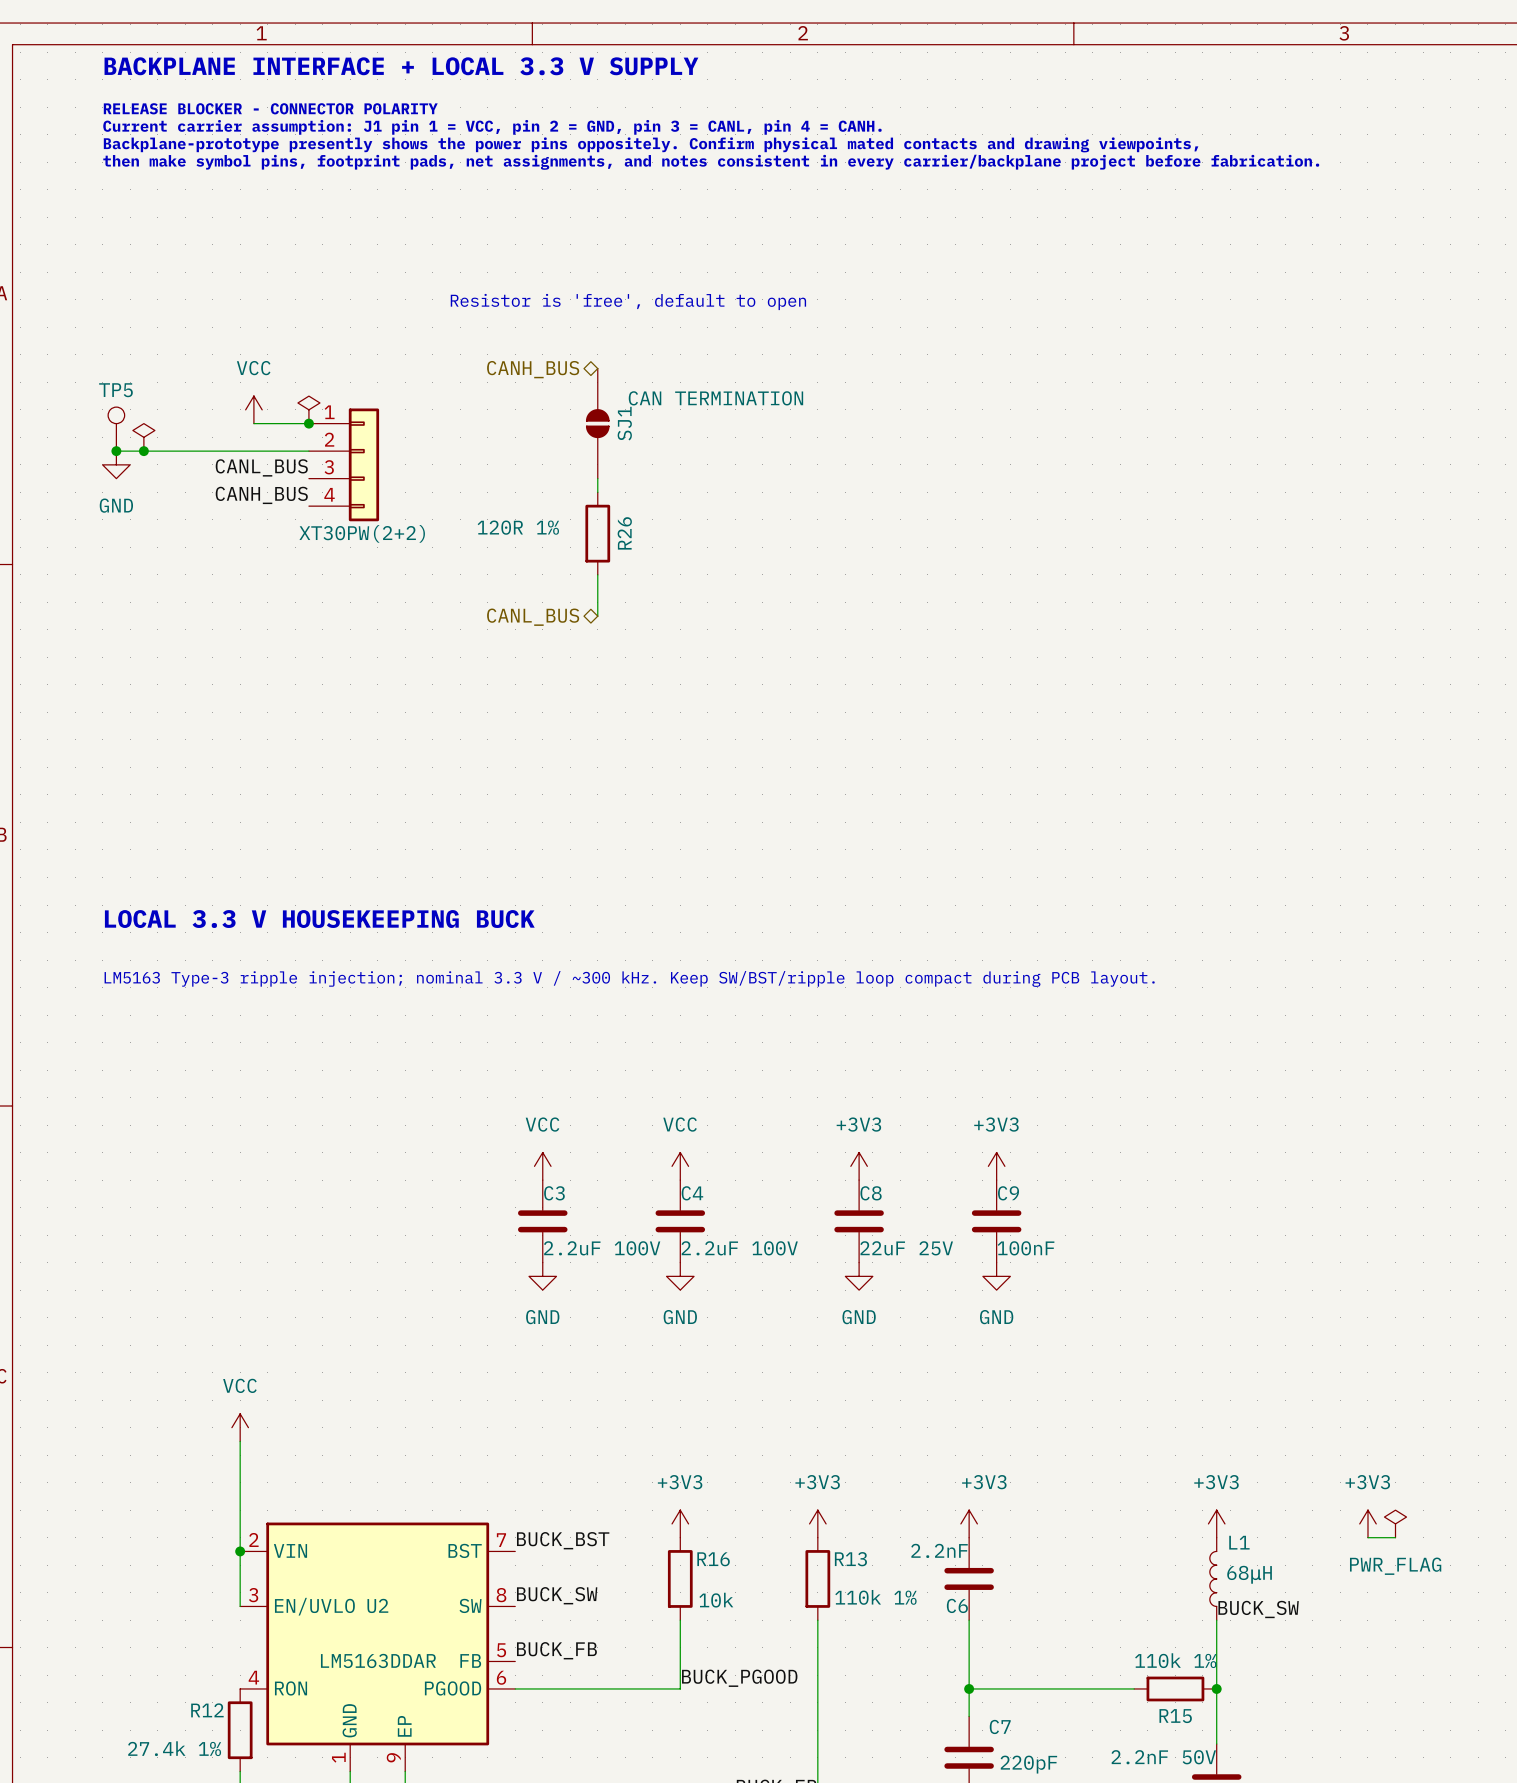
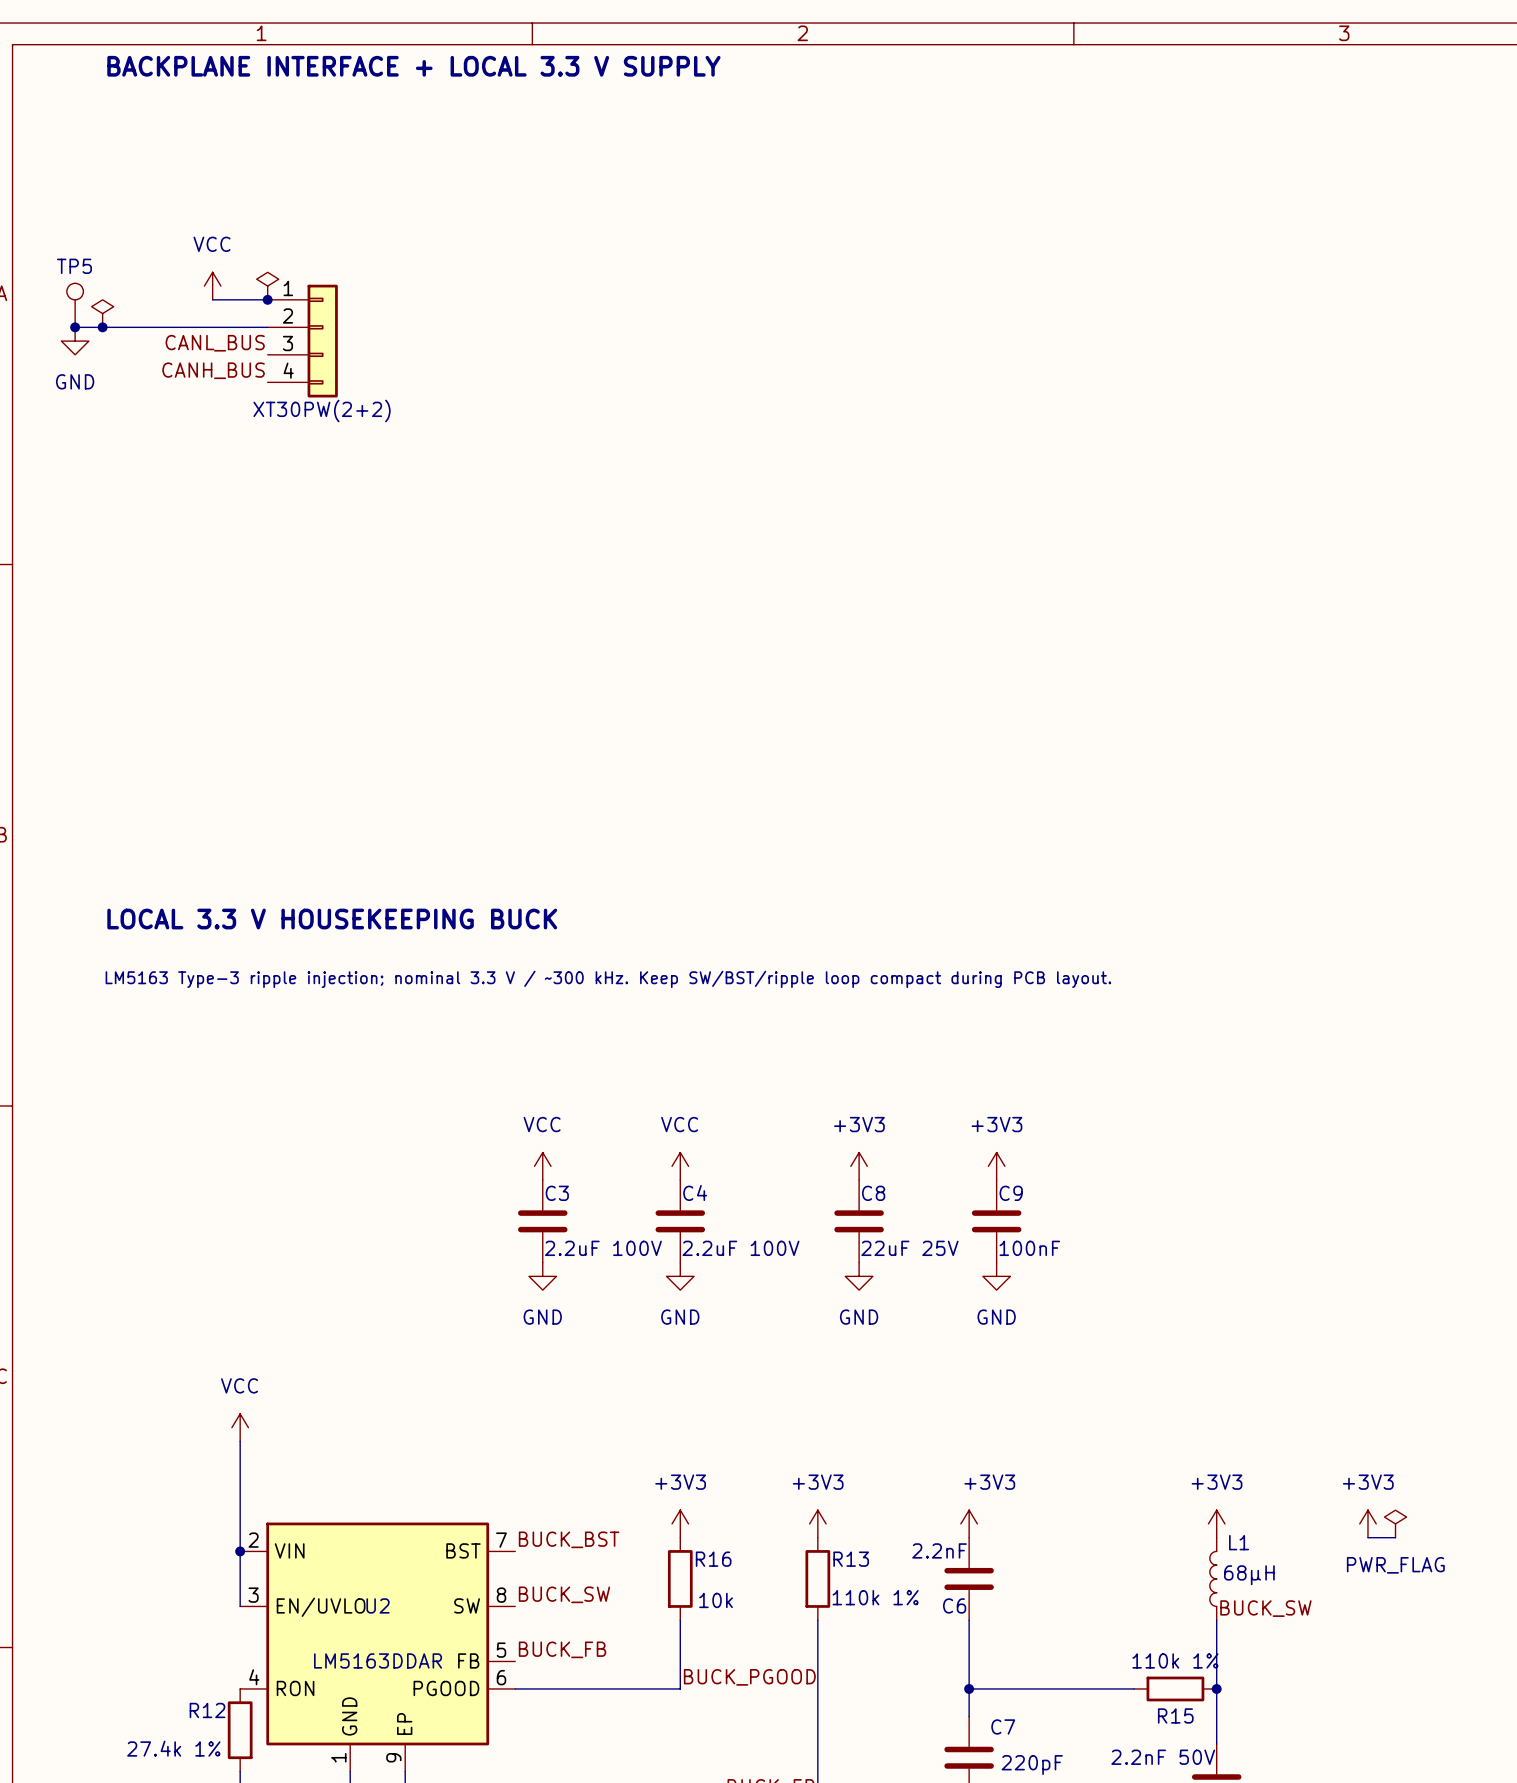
text: RELEASE BLOCKER - CONNECTOR POLARITY (270, 108) -> none
text: Current carrier assumption: J1 pin 1 = VCC, pin 2 = GND, pin 3 = CANL, pin 4 = CANH. (492, 127) -> none
text: Backplane-prototype presently shows the power pins oppositely. Confirm physical mated contacts and drawing viewpoints, (651, 144) -> none
text: then make symbol pins, footprint pads, net assignments, and notes consistent in every carrier/backplane project before fabrication. (711, 162) -> none
power symbol: none -> (267, 286)
junction: none -> (267, 299)
text: Resistor is 'free', default to open (628, 301) -> none
power symbol: none -> (102, 313)
junction: none -> (75, 327)
junction: none -> (102, 327)
hierarchical label: CANH_BUS (533, 369) -> none
power symbol position: VCC (253, 409) -> VCC (212, 286)
power symbol: (308, 409) -> none
wire: (253, 423) (308, 423) -> (212, 299) (267, 299)
junction: (308, 423) -> none
SJ1: CAN TERMINATION (597, 423) -> none
TP5 position: (116, 429) -> (75, 305)
power symbol: (143, 437) -> none
wire: (116, 451) (308, 451) -> (75, 327) (267, 327)
junction: (116, 451) -> none
junction: (143, 451) -> none
power symbol position: GND (116, 464) -> GND (75, 341)
part position: (344, 464) -> (302, 341)
label position: CANL_BUS (261, 467) -> CANL_BUS (215, 343)
wire: (597, 478) (597, 492) -> none
label position: CANH_BUS (261, 495) -> CANH_BUS (213, 370)
R26: 120R 1% (597, 533) -> none
wire: (597, 574) (597, 616) -> none
hierarchical label: CANL_BUS (533, 617) -> none

